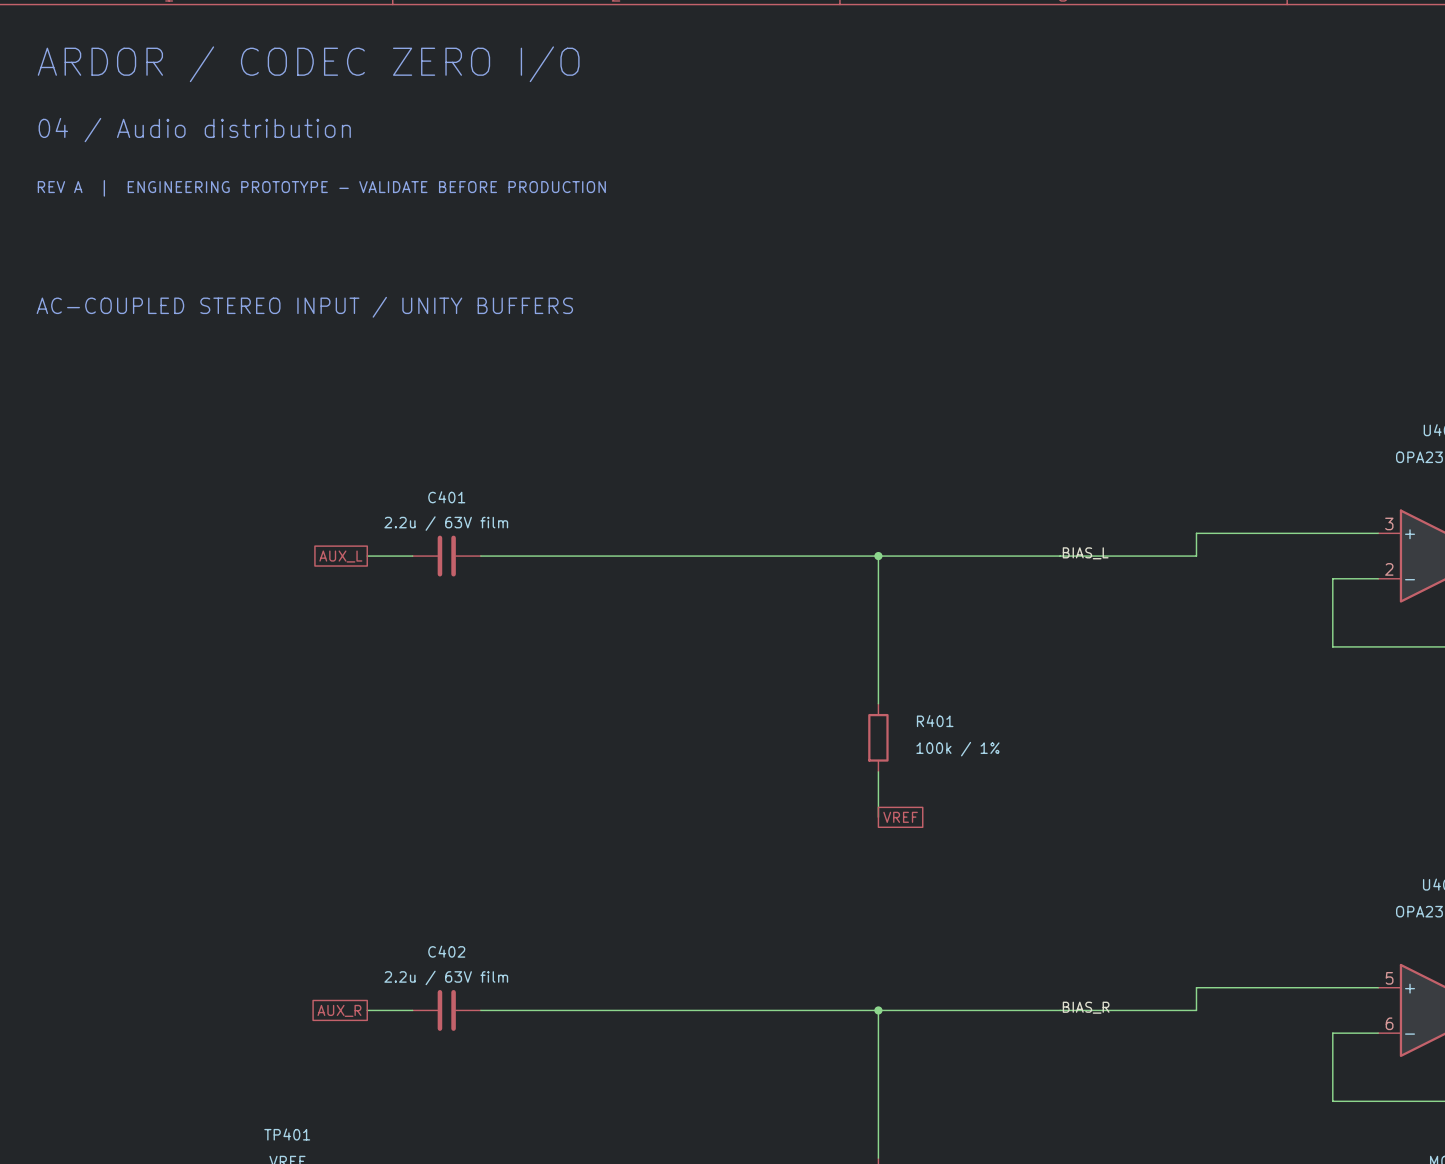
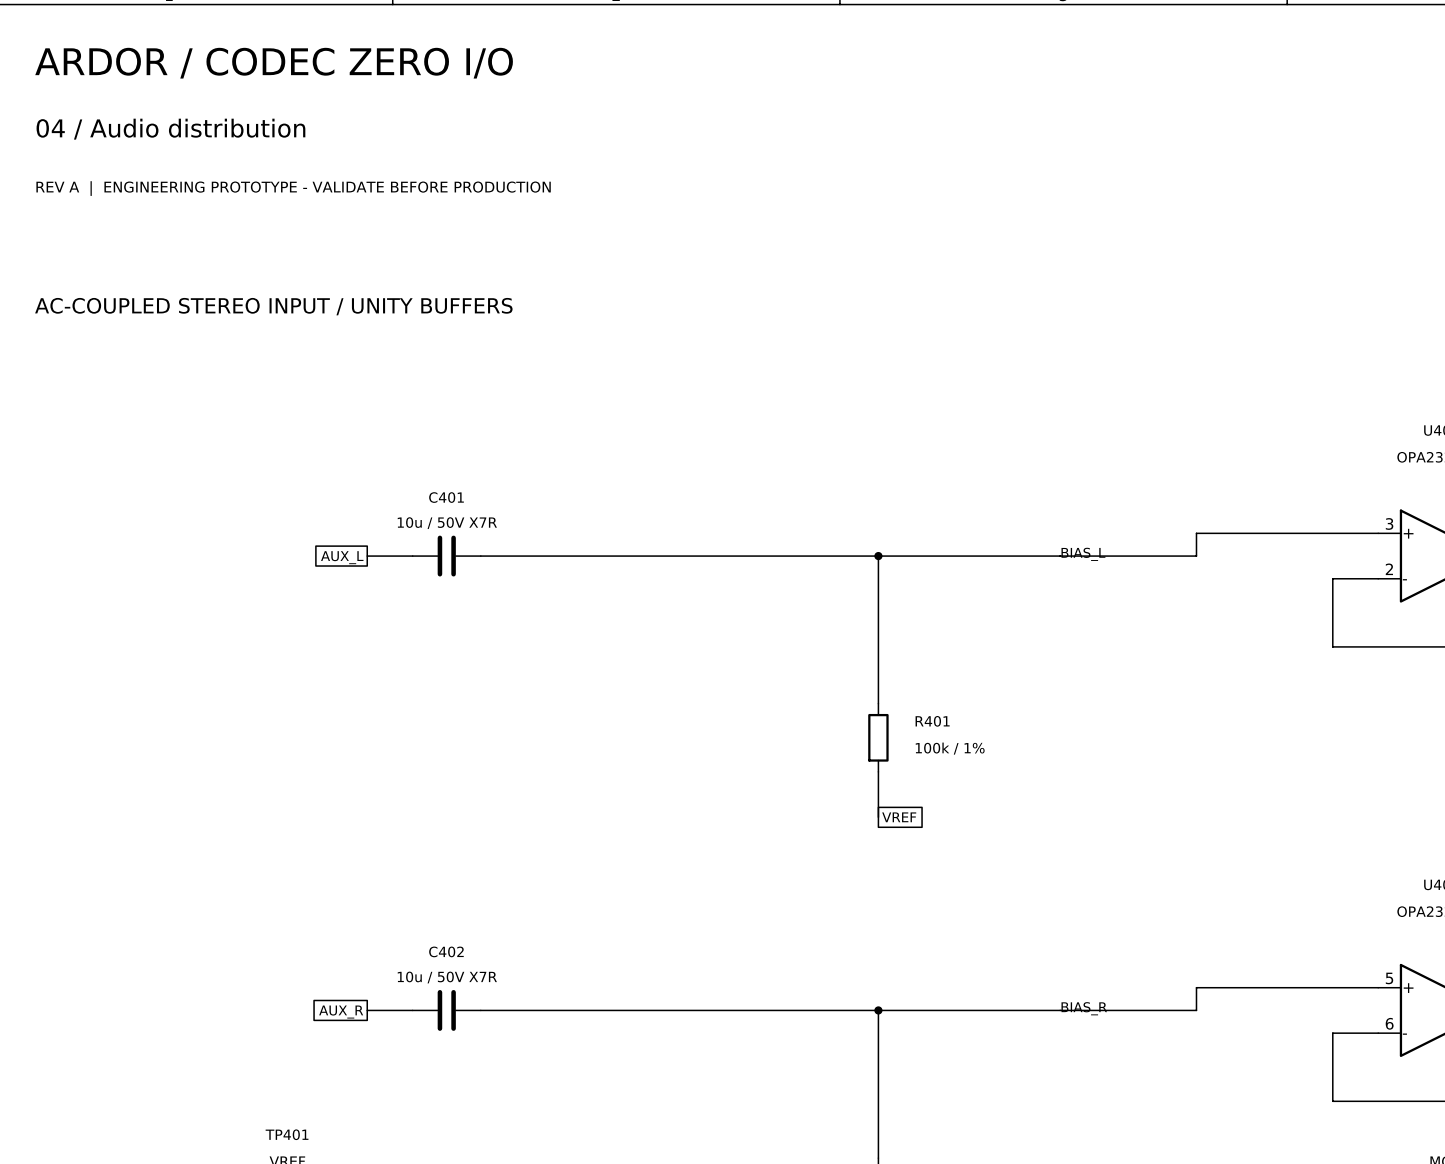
C401 value: 2.2u / 63V film (446, 523) -> 10u / 50V X7R (447, 523)
C402 value: 2.2u / 63V film (446, 977) -> 10u / 50V X7R (447, 977)

